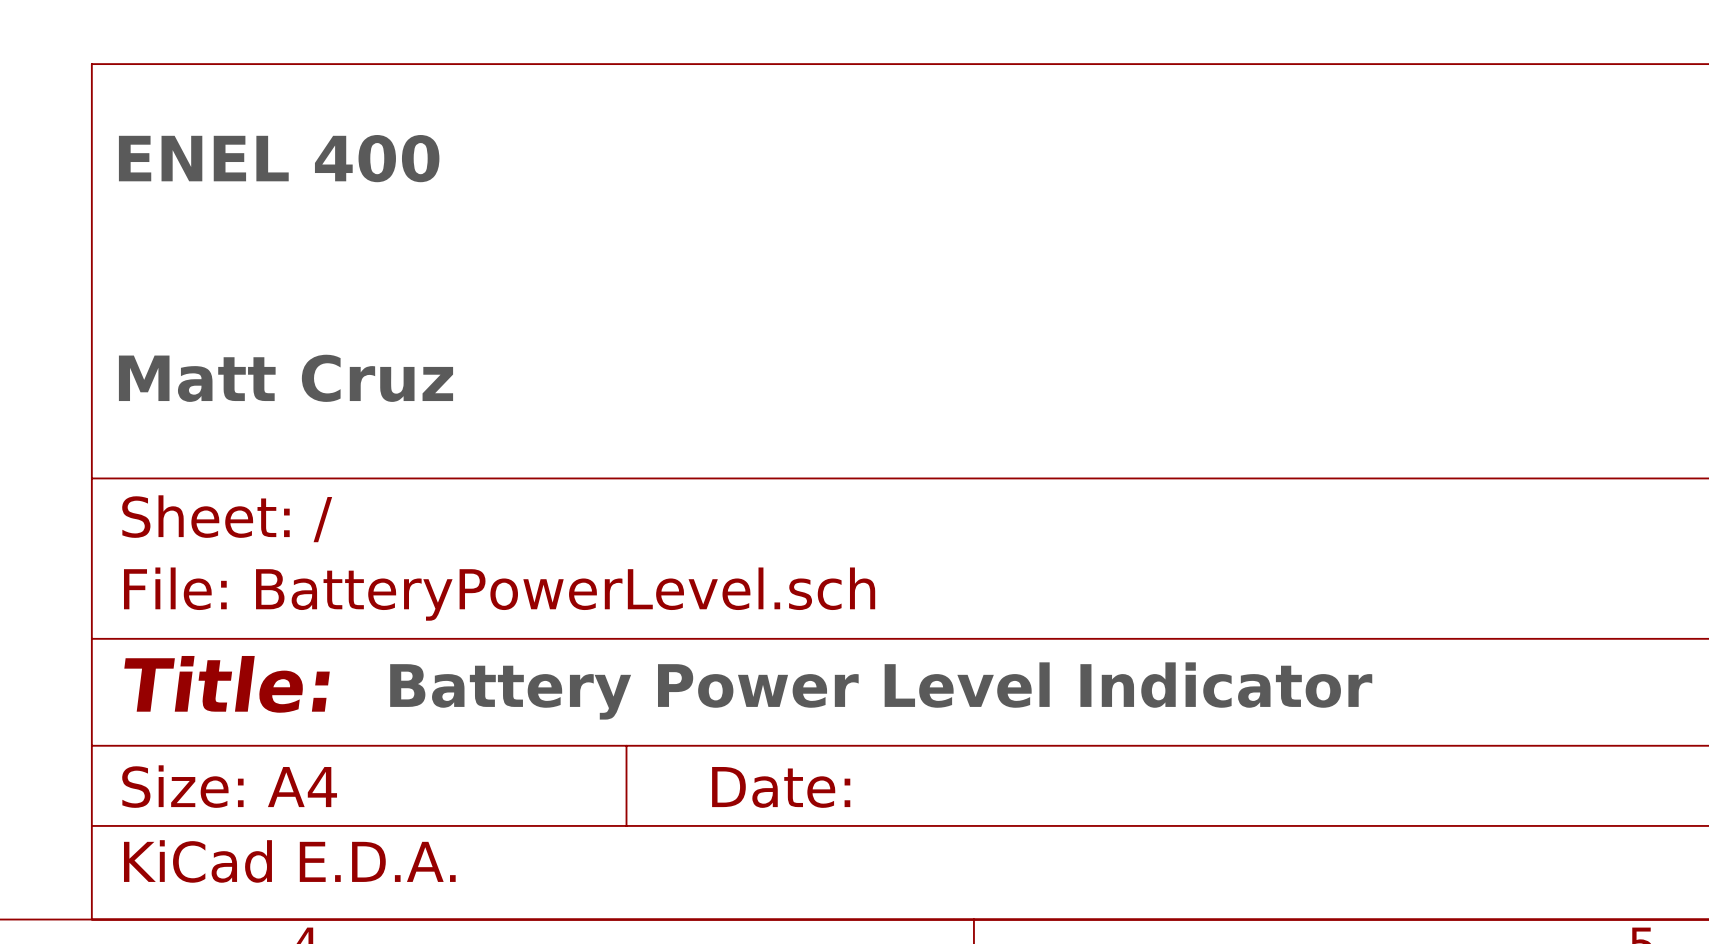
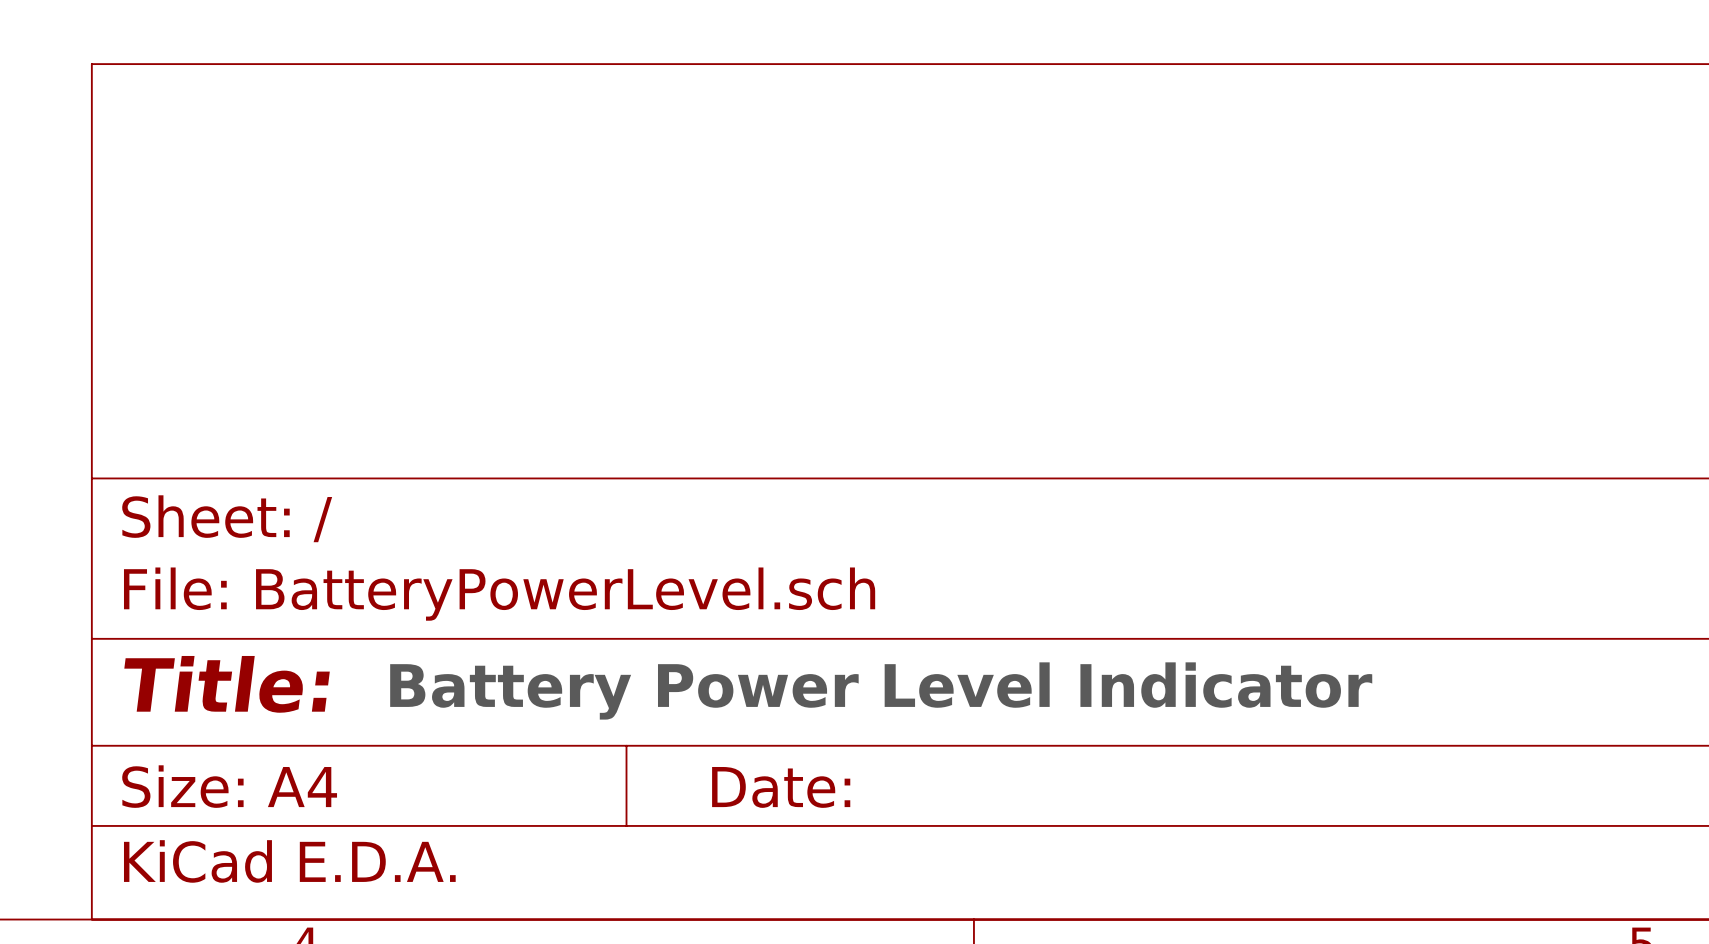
text: ENEL 400 (279, 158) -> none
text: Matt Cruz (286, 378) -> none

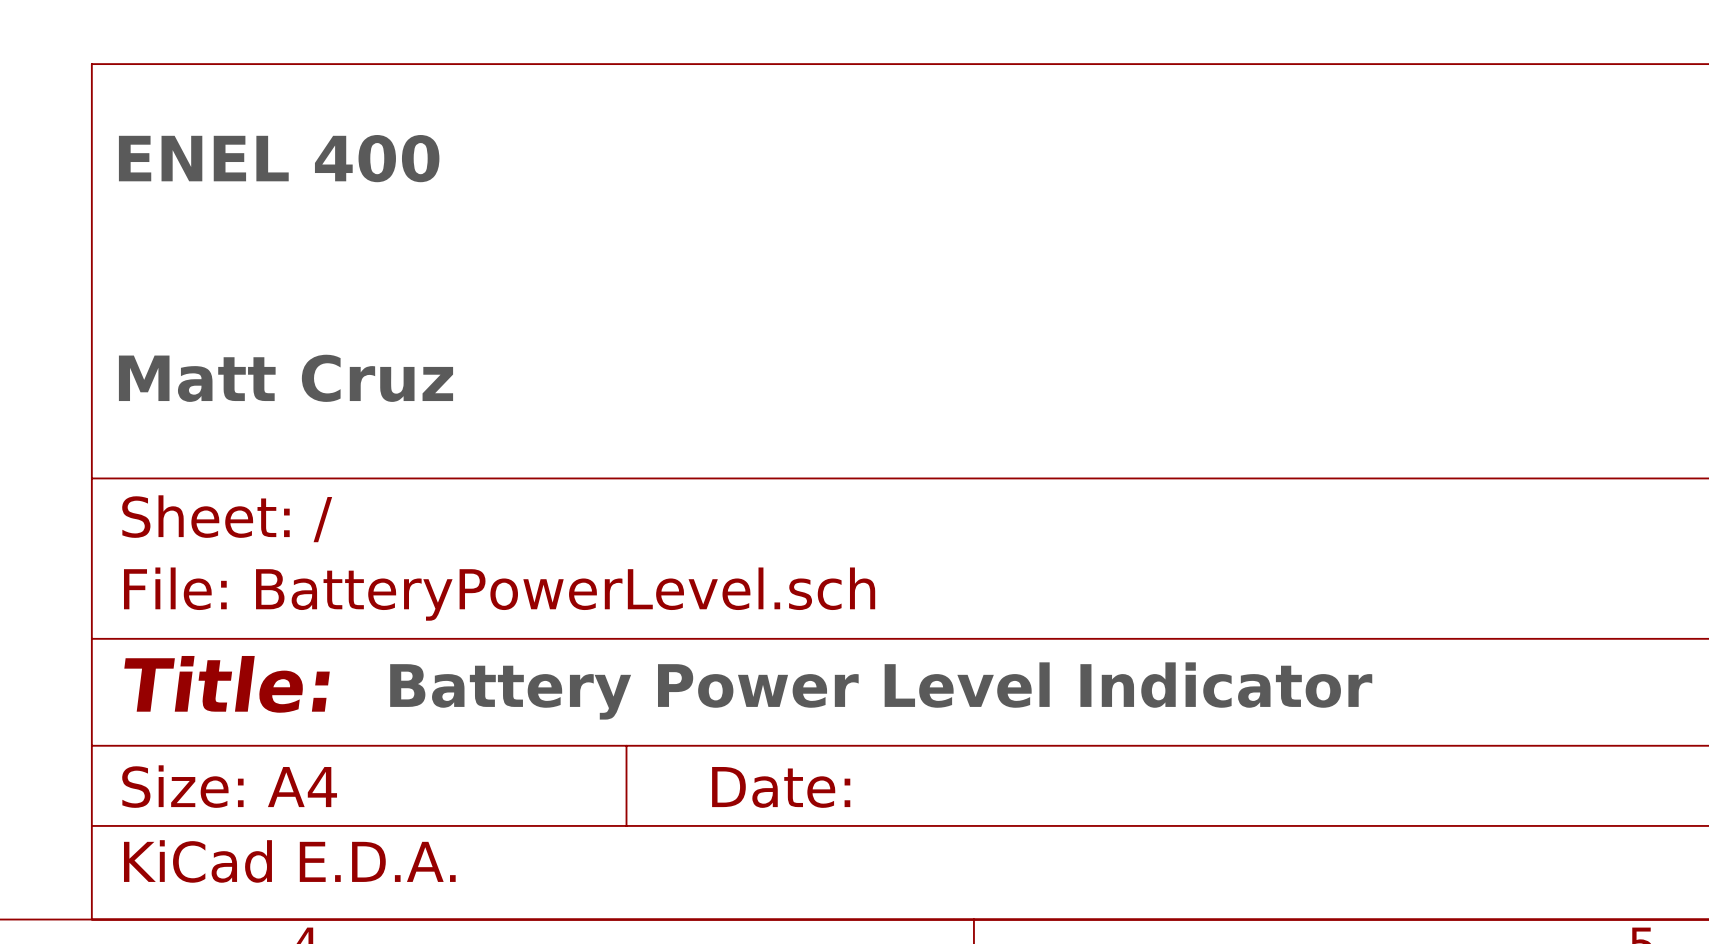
text: none -> ENEL 400 (279, 158)
text: none -> Matt Cruz (286, 378)

